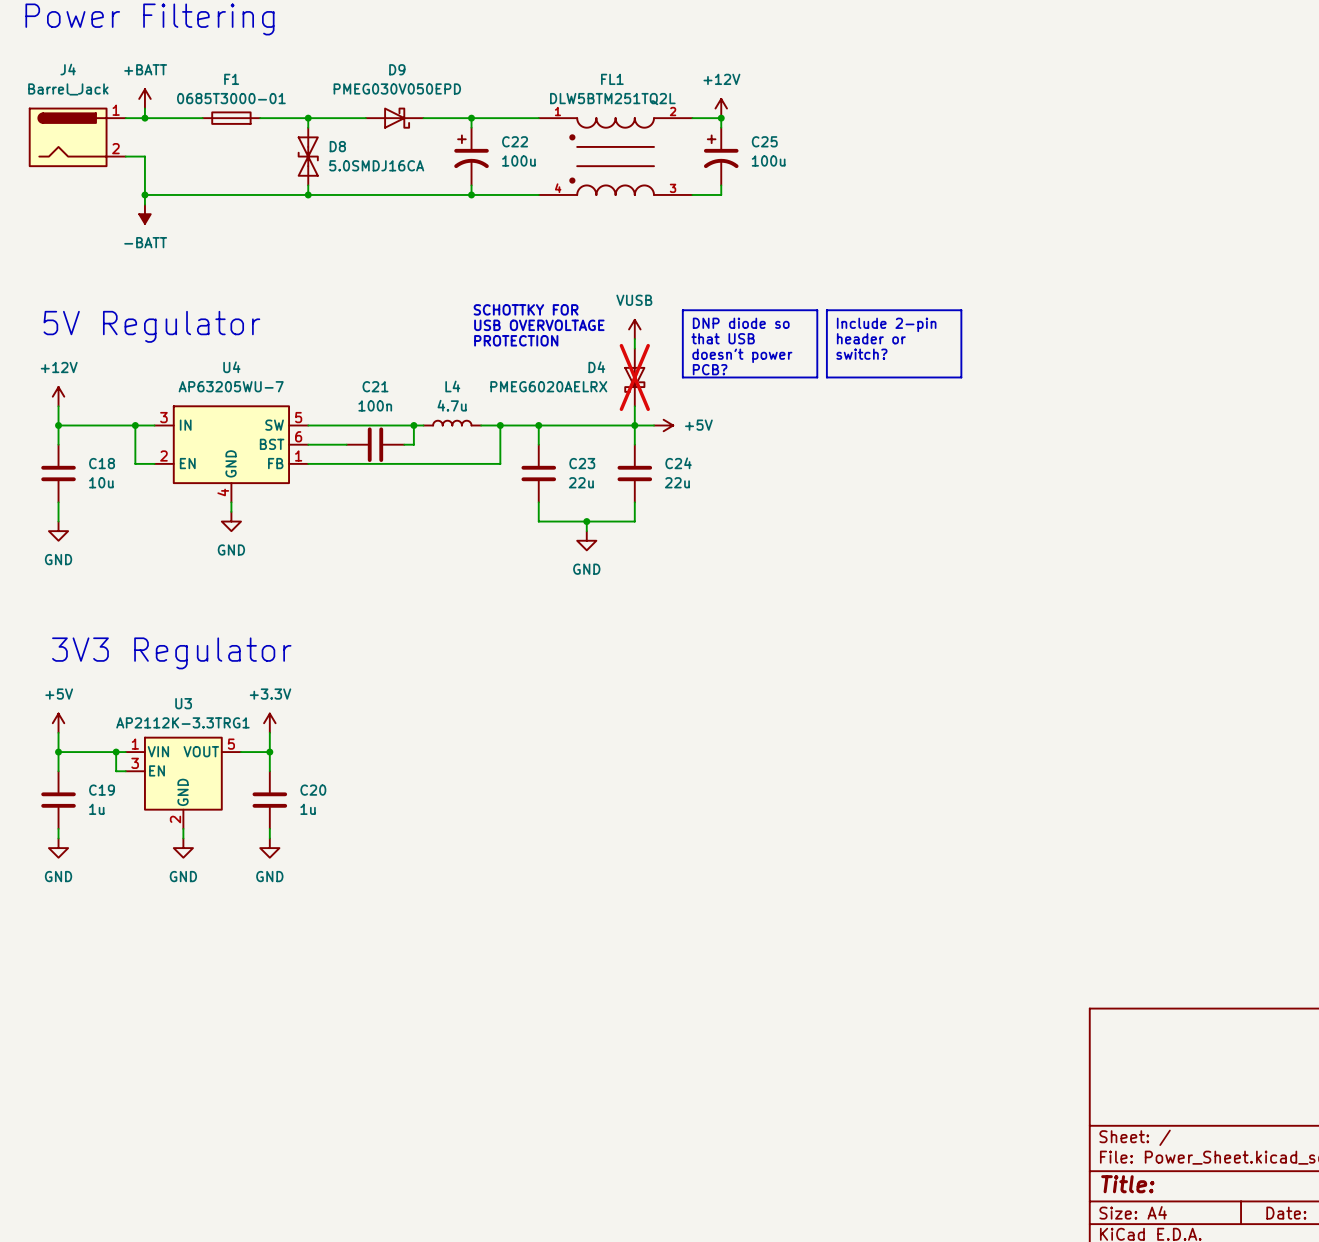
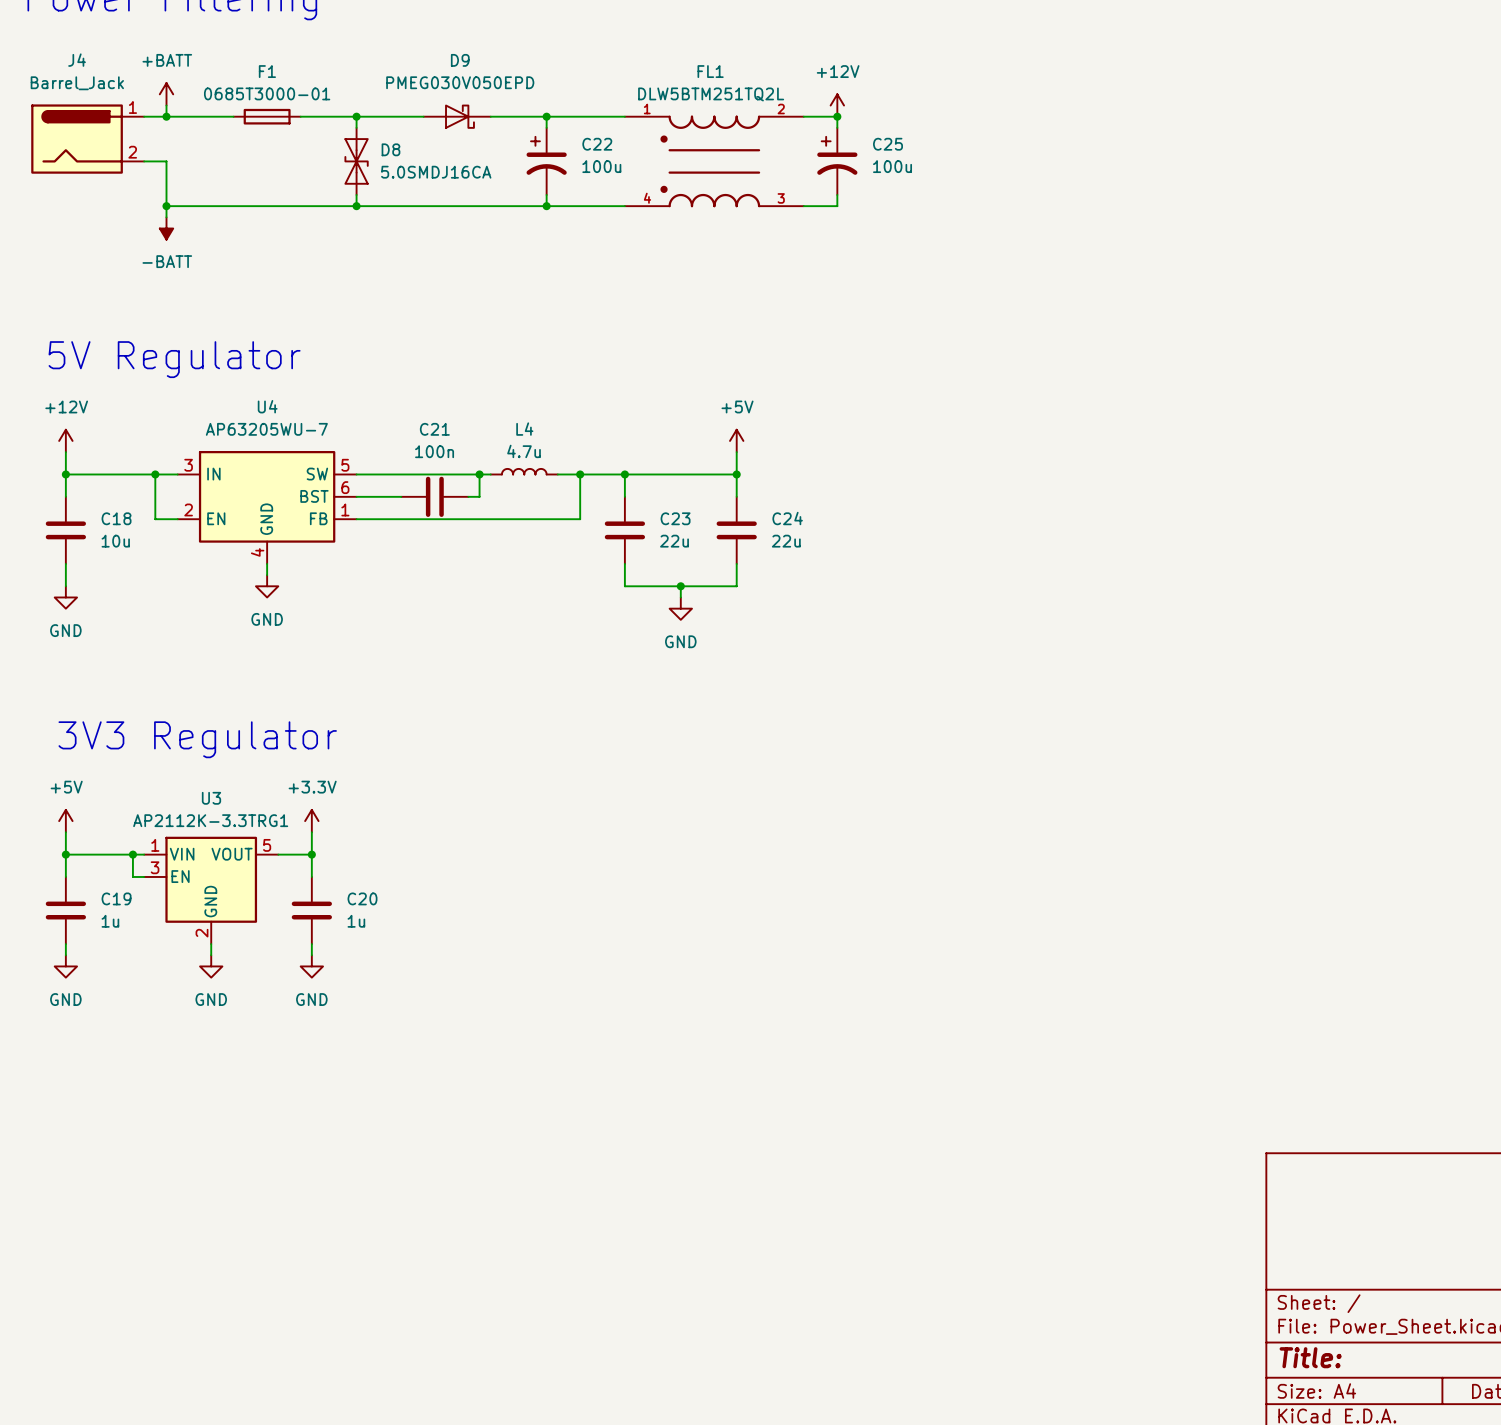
text: SCHOTTKY FOR (526, 309) -> none
line: (682, 310) (817, 310) (817, 377) (682, 377) (682, 310) -> none
line: (826, 310) (961, 310) (961, 377) (826, 377) (826, 310) -> none
text: DNP diode so (741, 323) -> none
text: Include 2-pin (886, 324) -> none
text: USB OVERVOLTAGE (539, 325) -> none
power symbol: VUSB (634, 329) -> none
text: that USB (723, 338) -> none
text: header or (871, 338) -> none
wire: (634, 339) (634, 348) -> none
text: PROTECTION (516, 340) -> none
text: switch? (861, 354) -> none
text: doesn't power (742, 355) -> none
text: PCB? (710, 369) -> none
D4: PMEG6020AELRX (634, 377) -> none
wire: (634, 425) (654, 425) -> none
power symbol rotation: 0° (663, 425) -> 90° counterclockwise (736, 440)
power symbol position: +5V (663, 425) -> +5V (736, 440)

